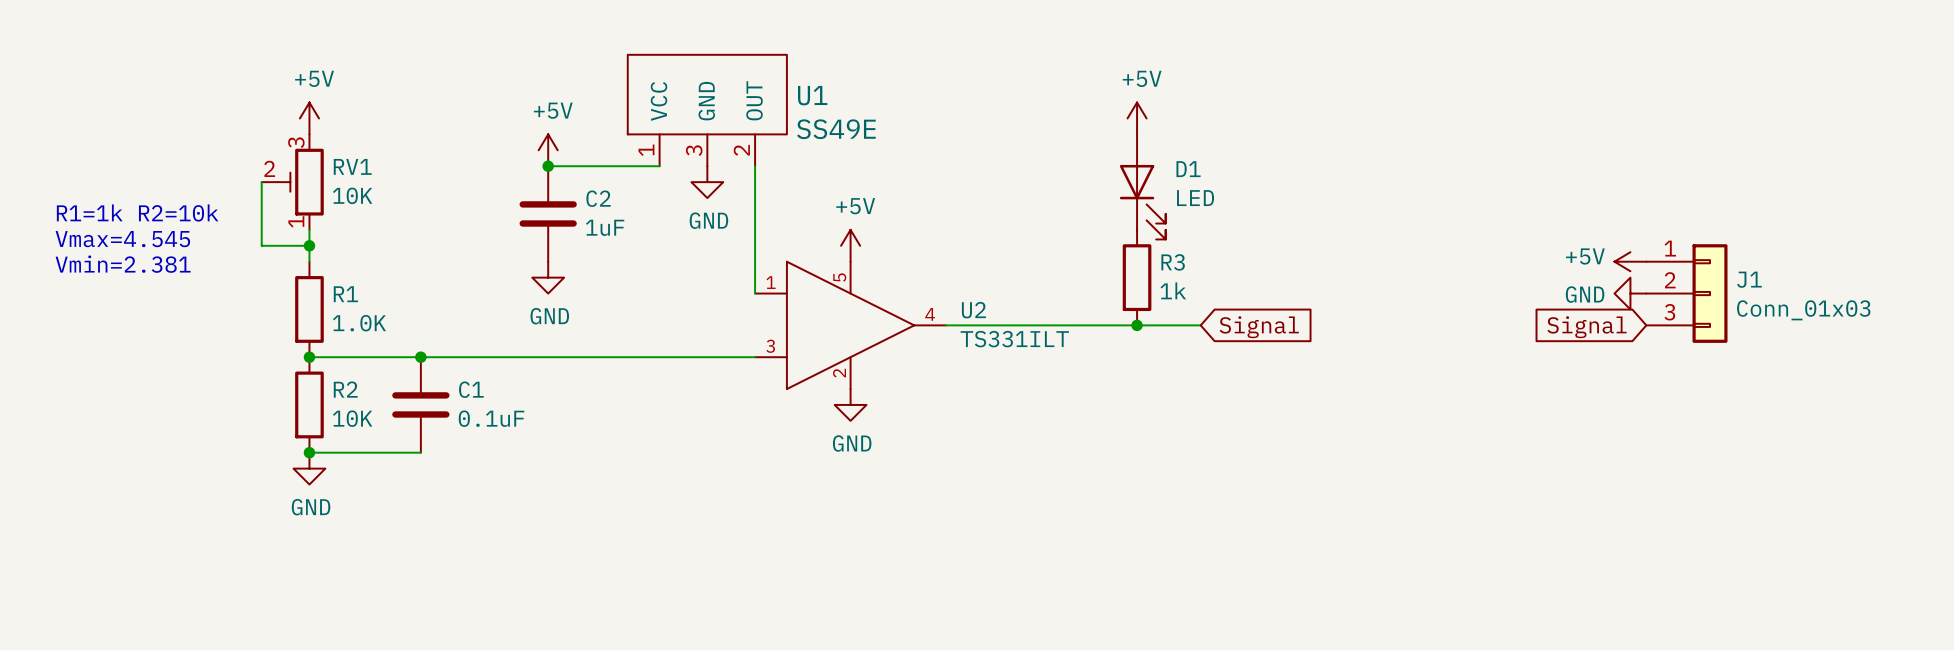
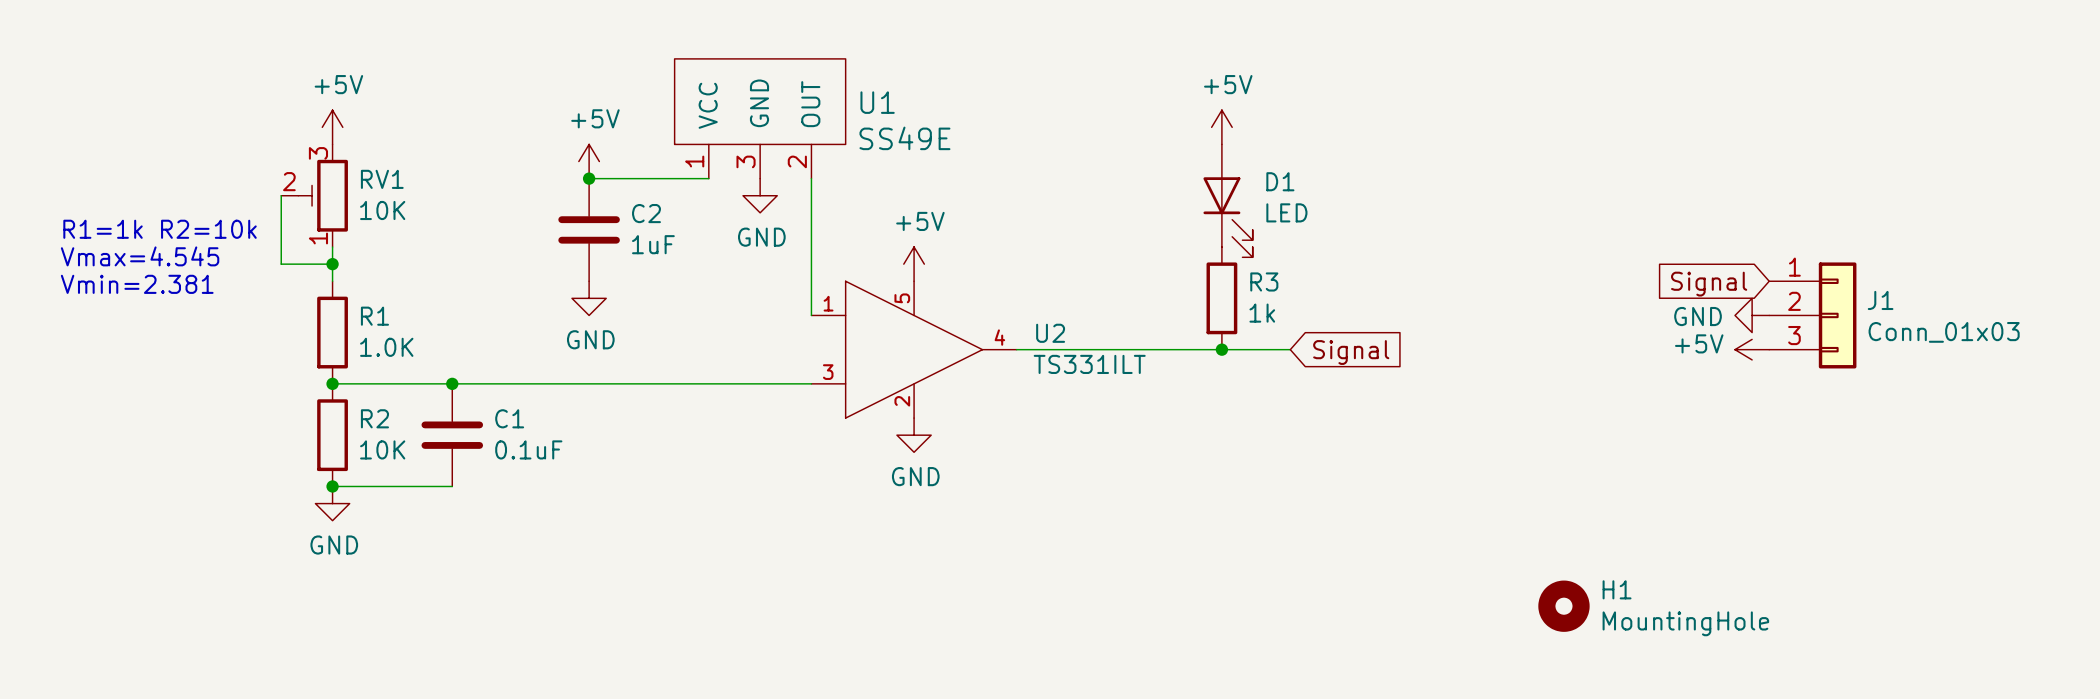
power symbol position: +5V (1630, 261) -> +5V (1752, 349)
global label position: Signal (1587, 327) -> Signal (1709, 284)
H1: none -> MountingHole (1563, 606)

